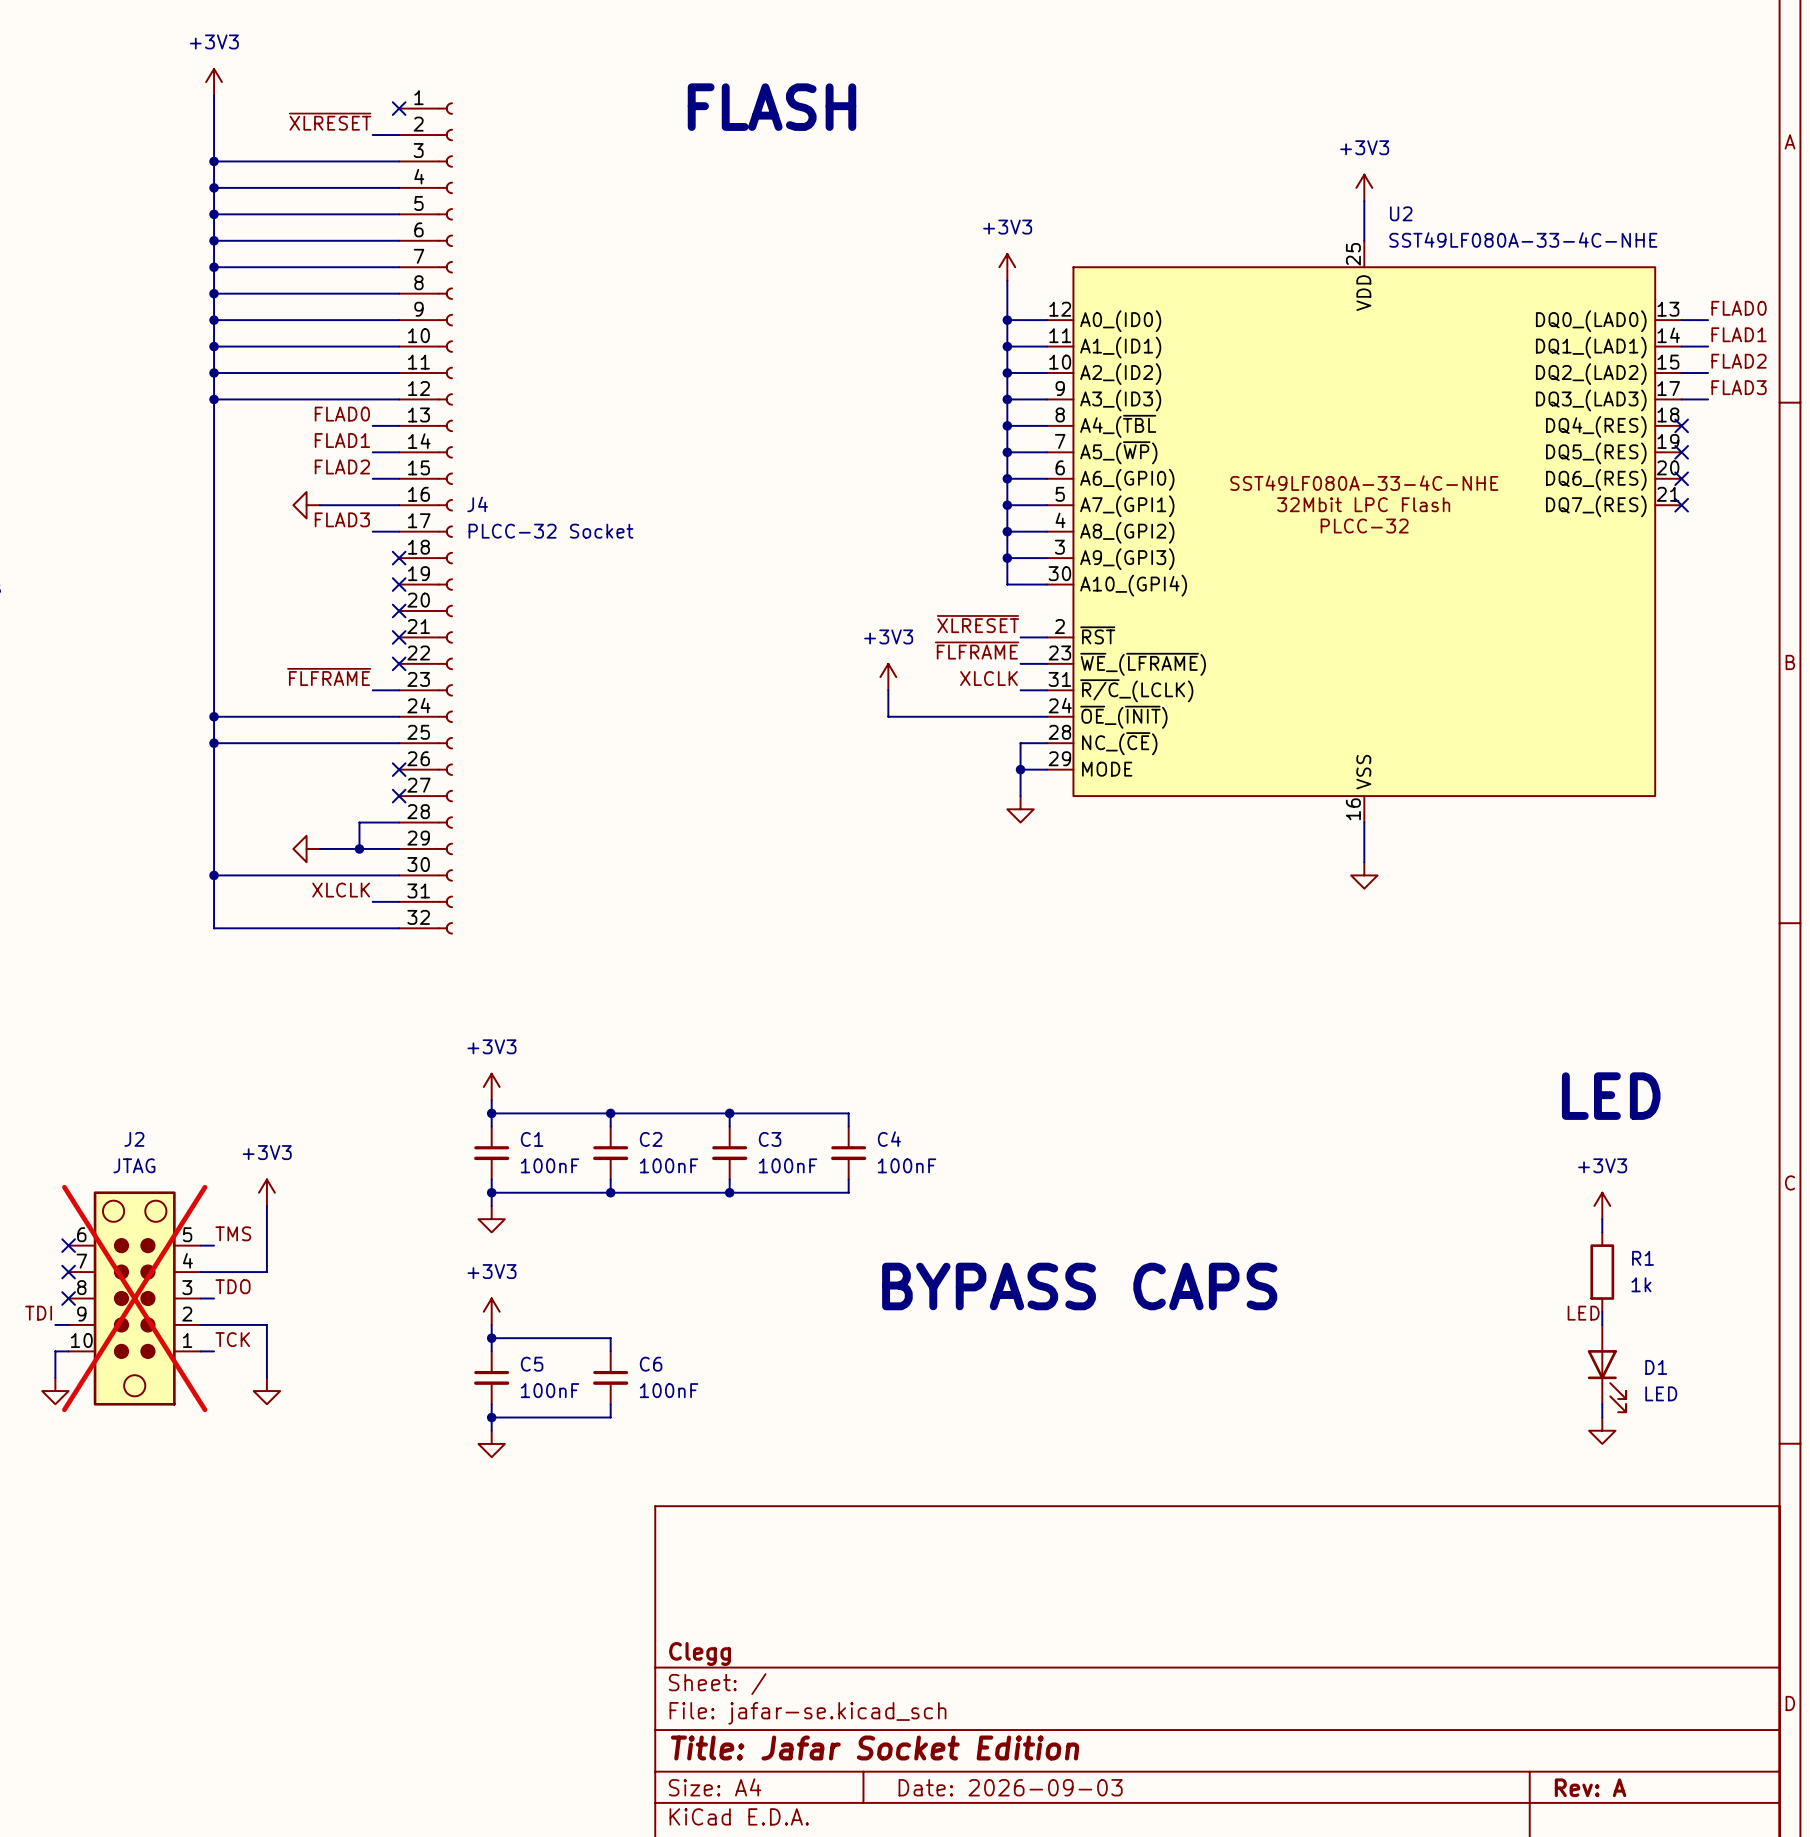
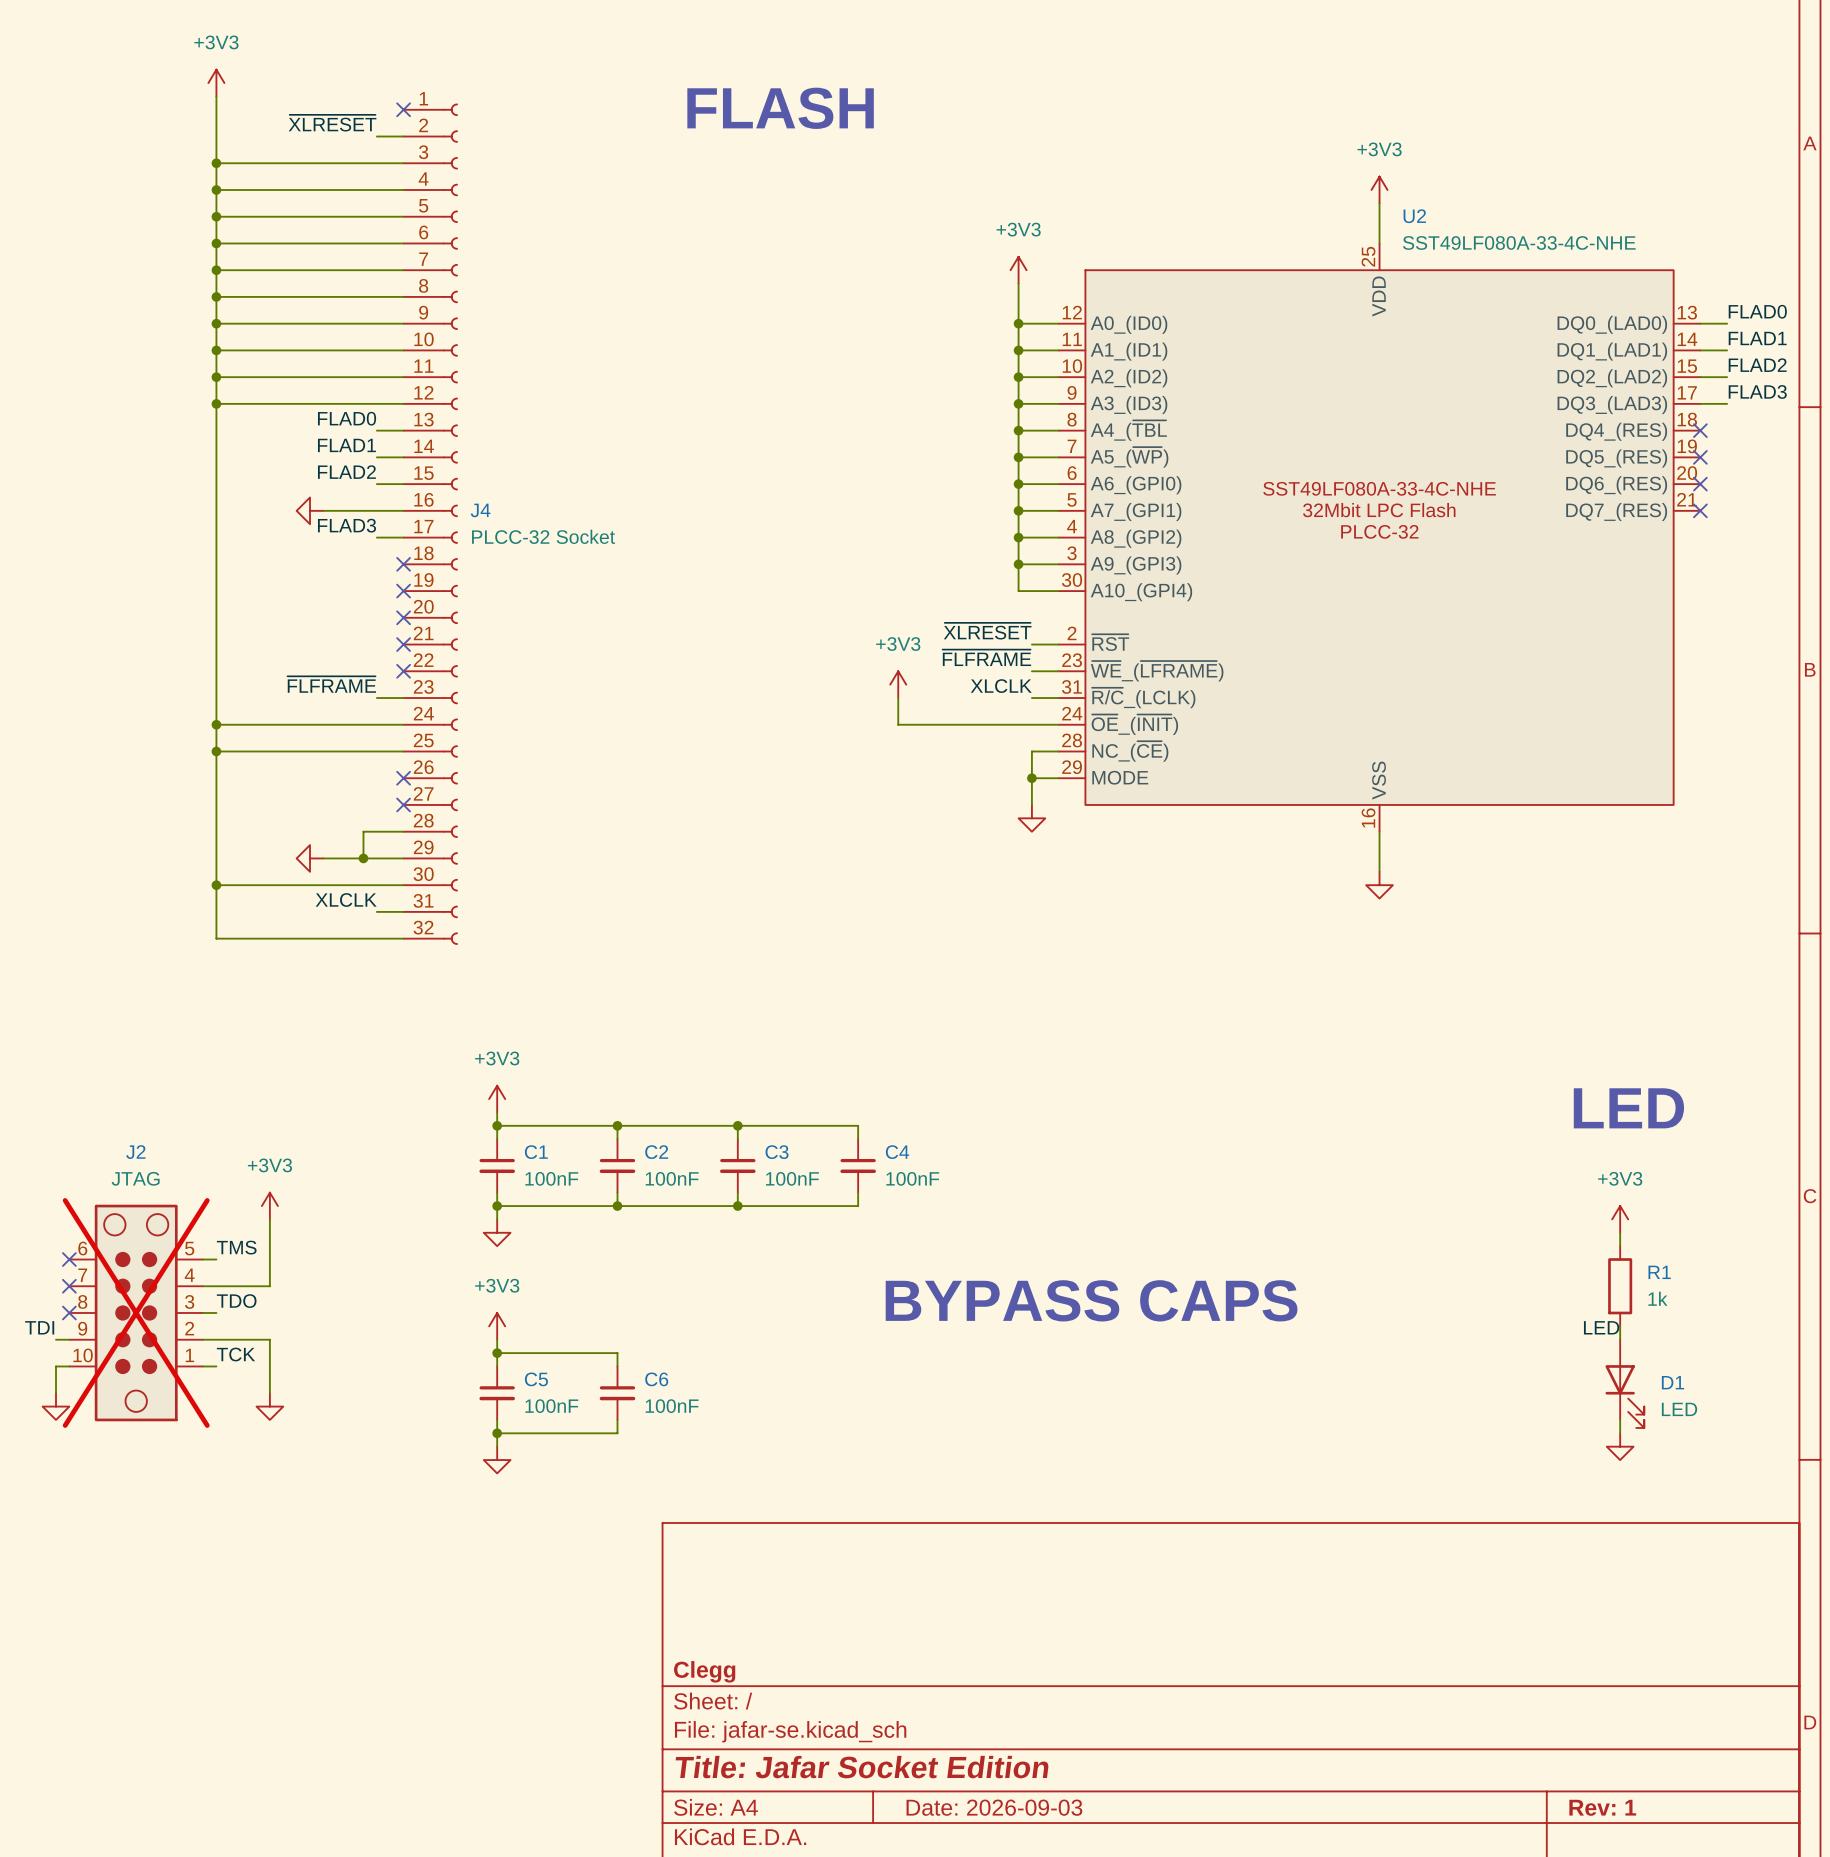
title block: Rev: A (1590, 1787) -> Rev: 1 (1602, 1807)

